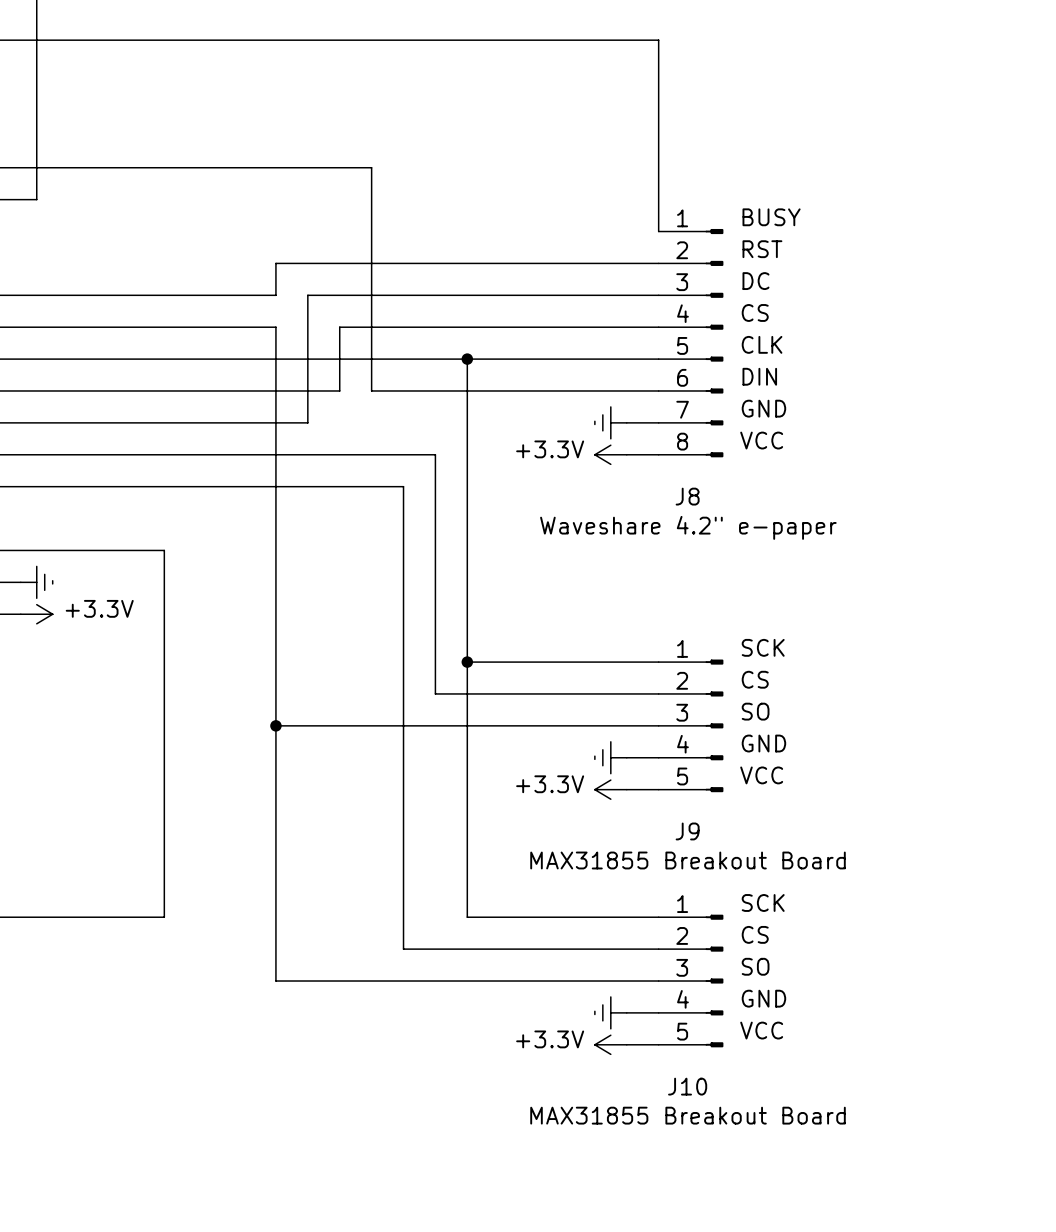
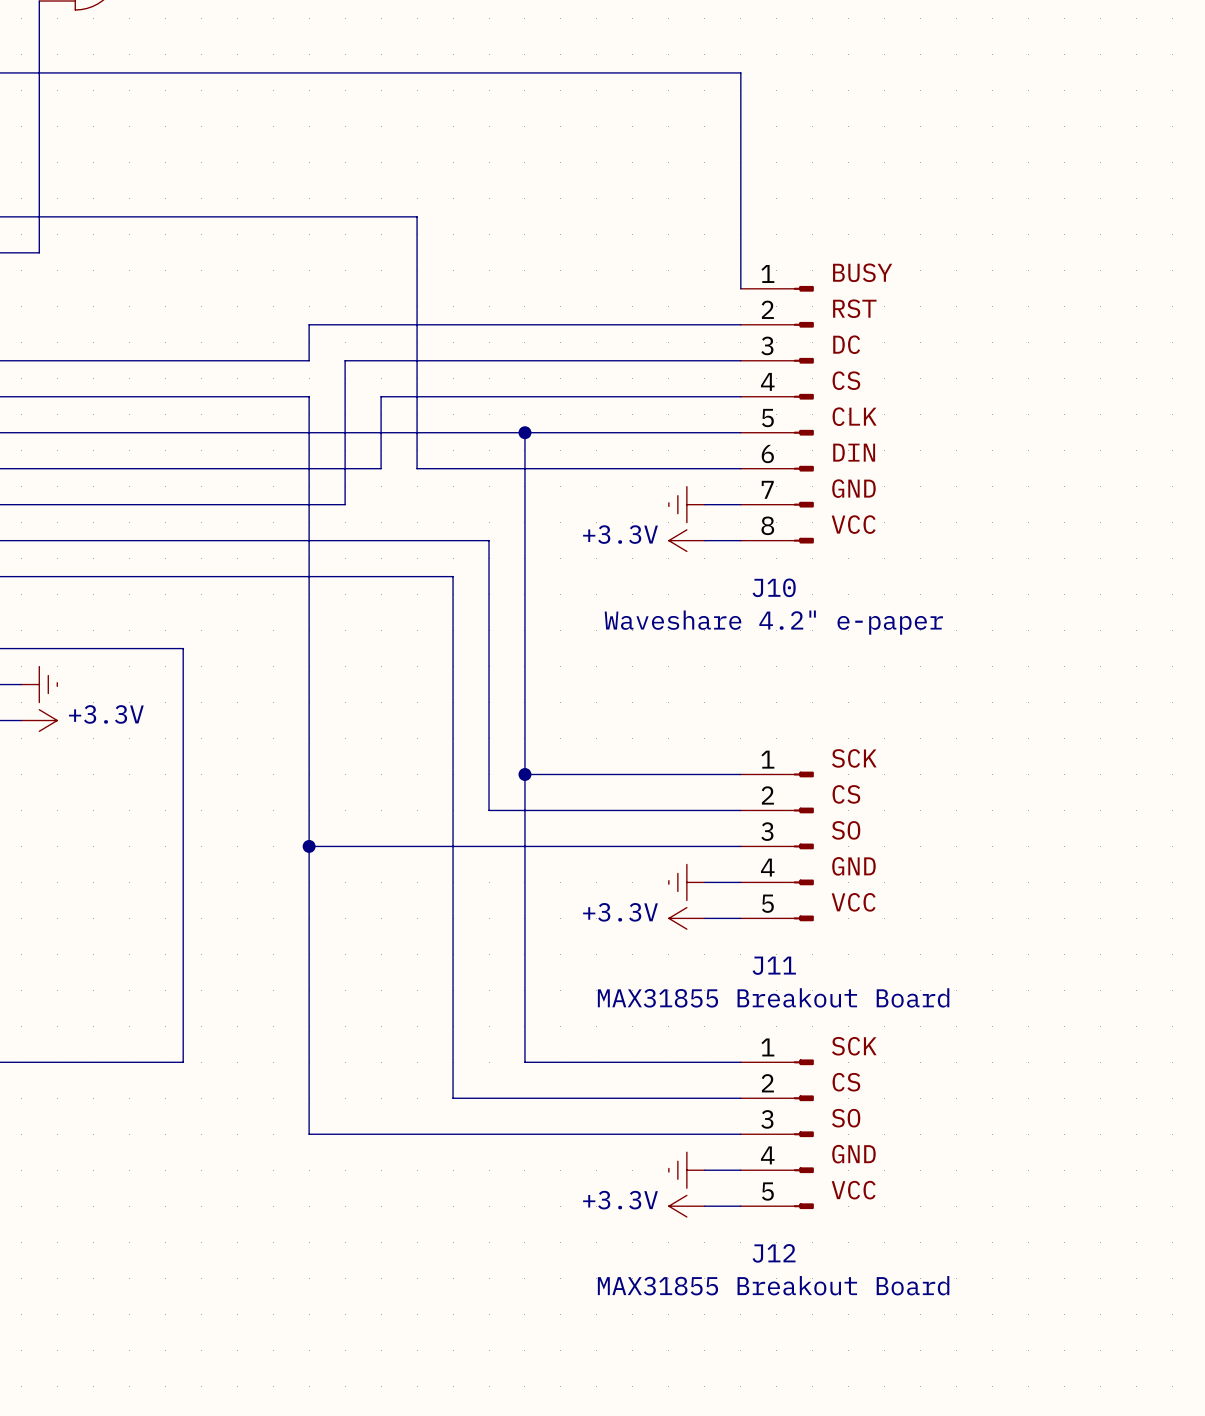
J8 name: J8 (687, 496) -> J10 (774, 587)
J9 name: J9 (687, 831) -> J11 (774, 965)
J10 name: J10 (687, 1086) -> J12 (774, 1253)

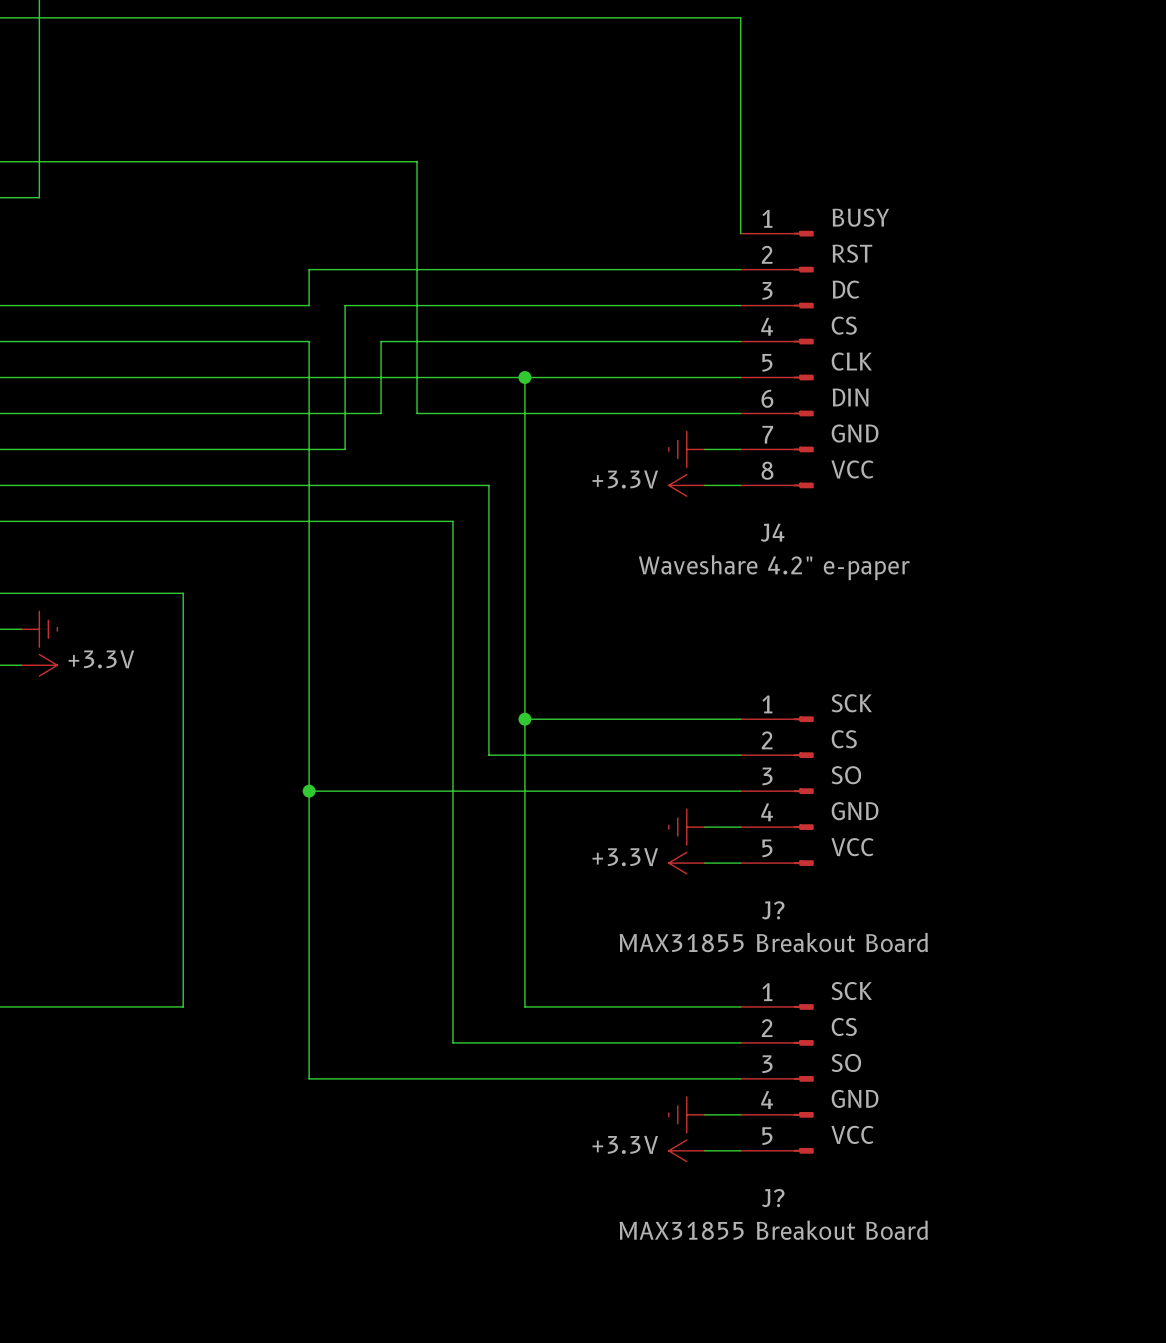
J10 name: J10 (774, 587) -> J4 (772, 532)
J11 name: J11 (774, 965) -> J? (773, 910)
J12 name: J12 (774, 1253) -> J? (773, 1198)

